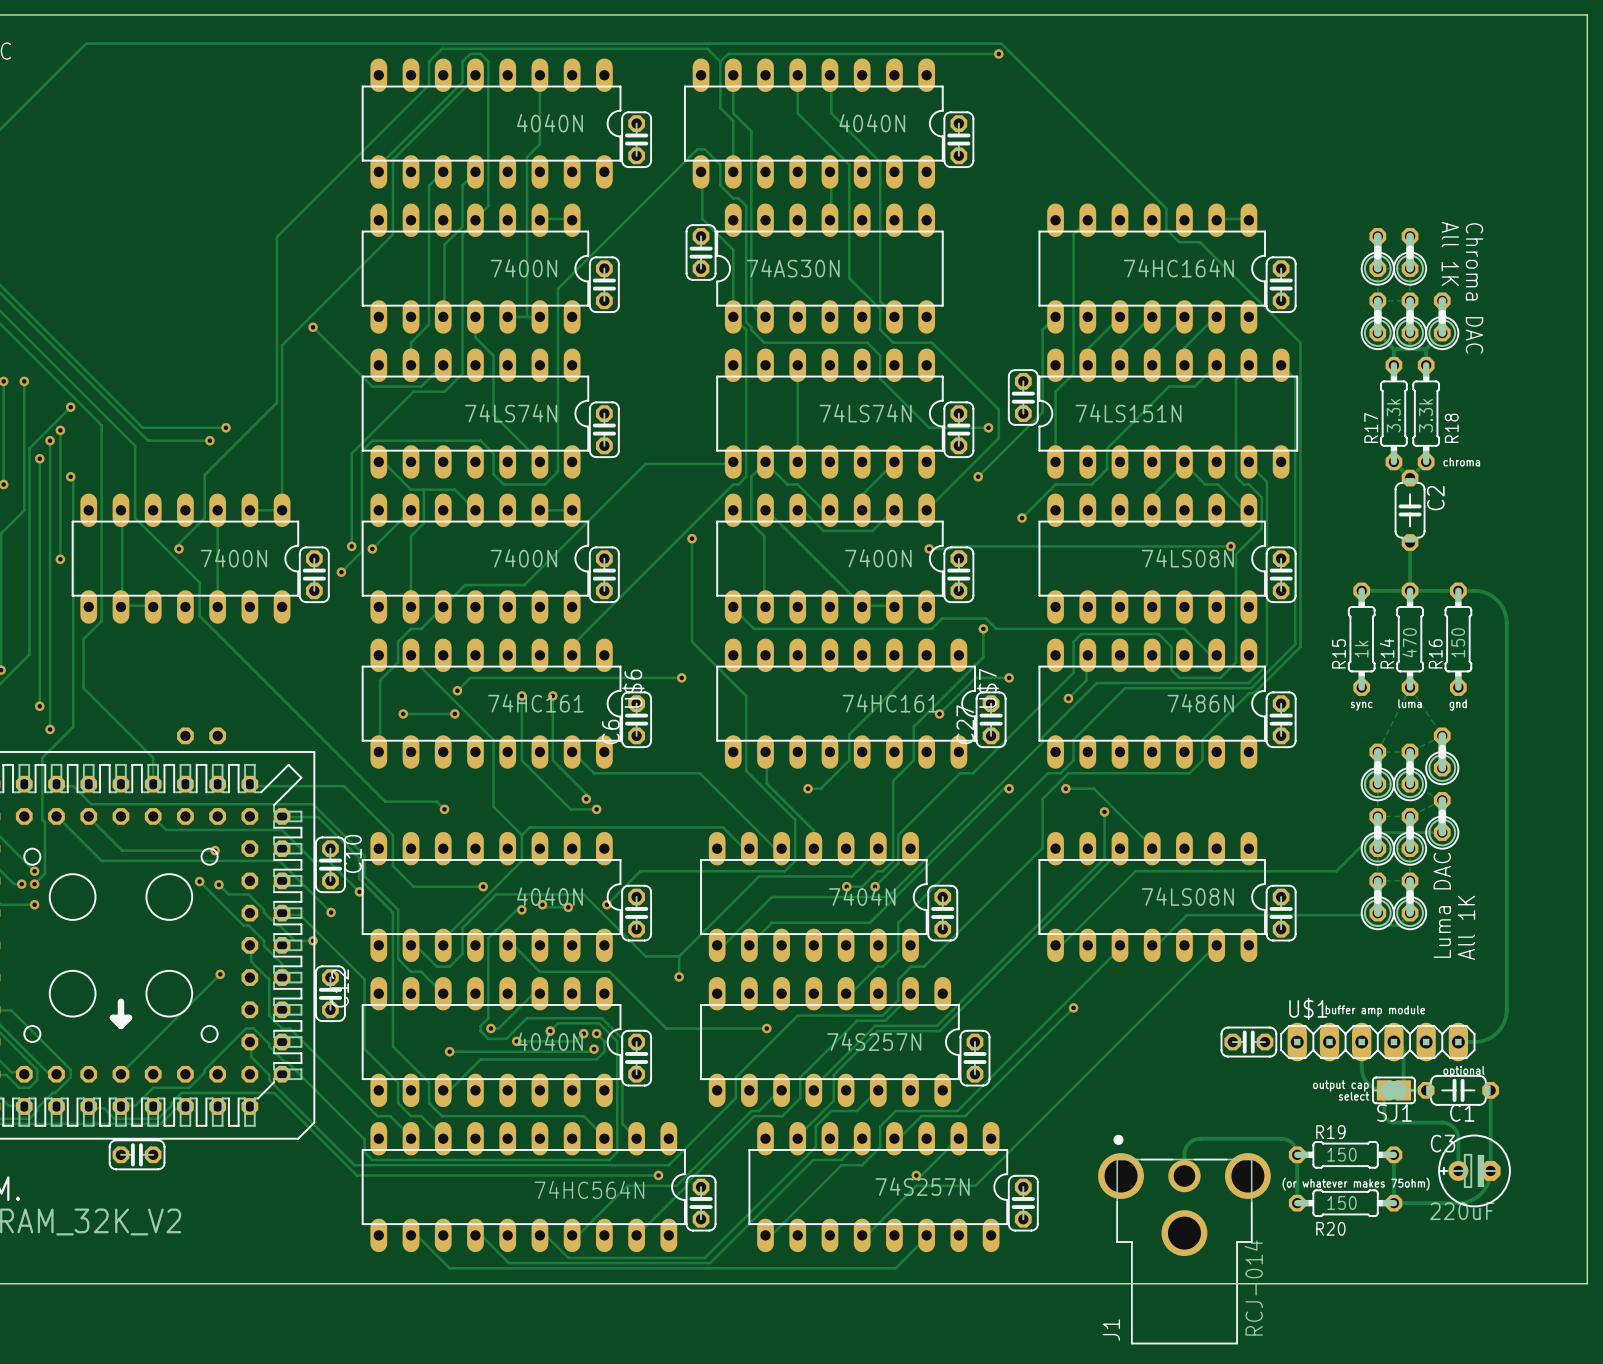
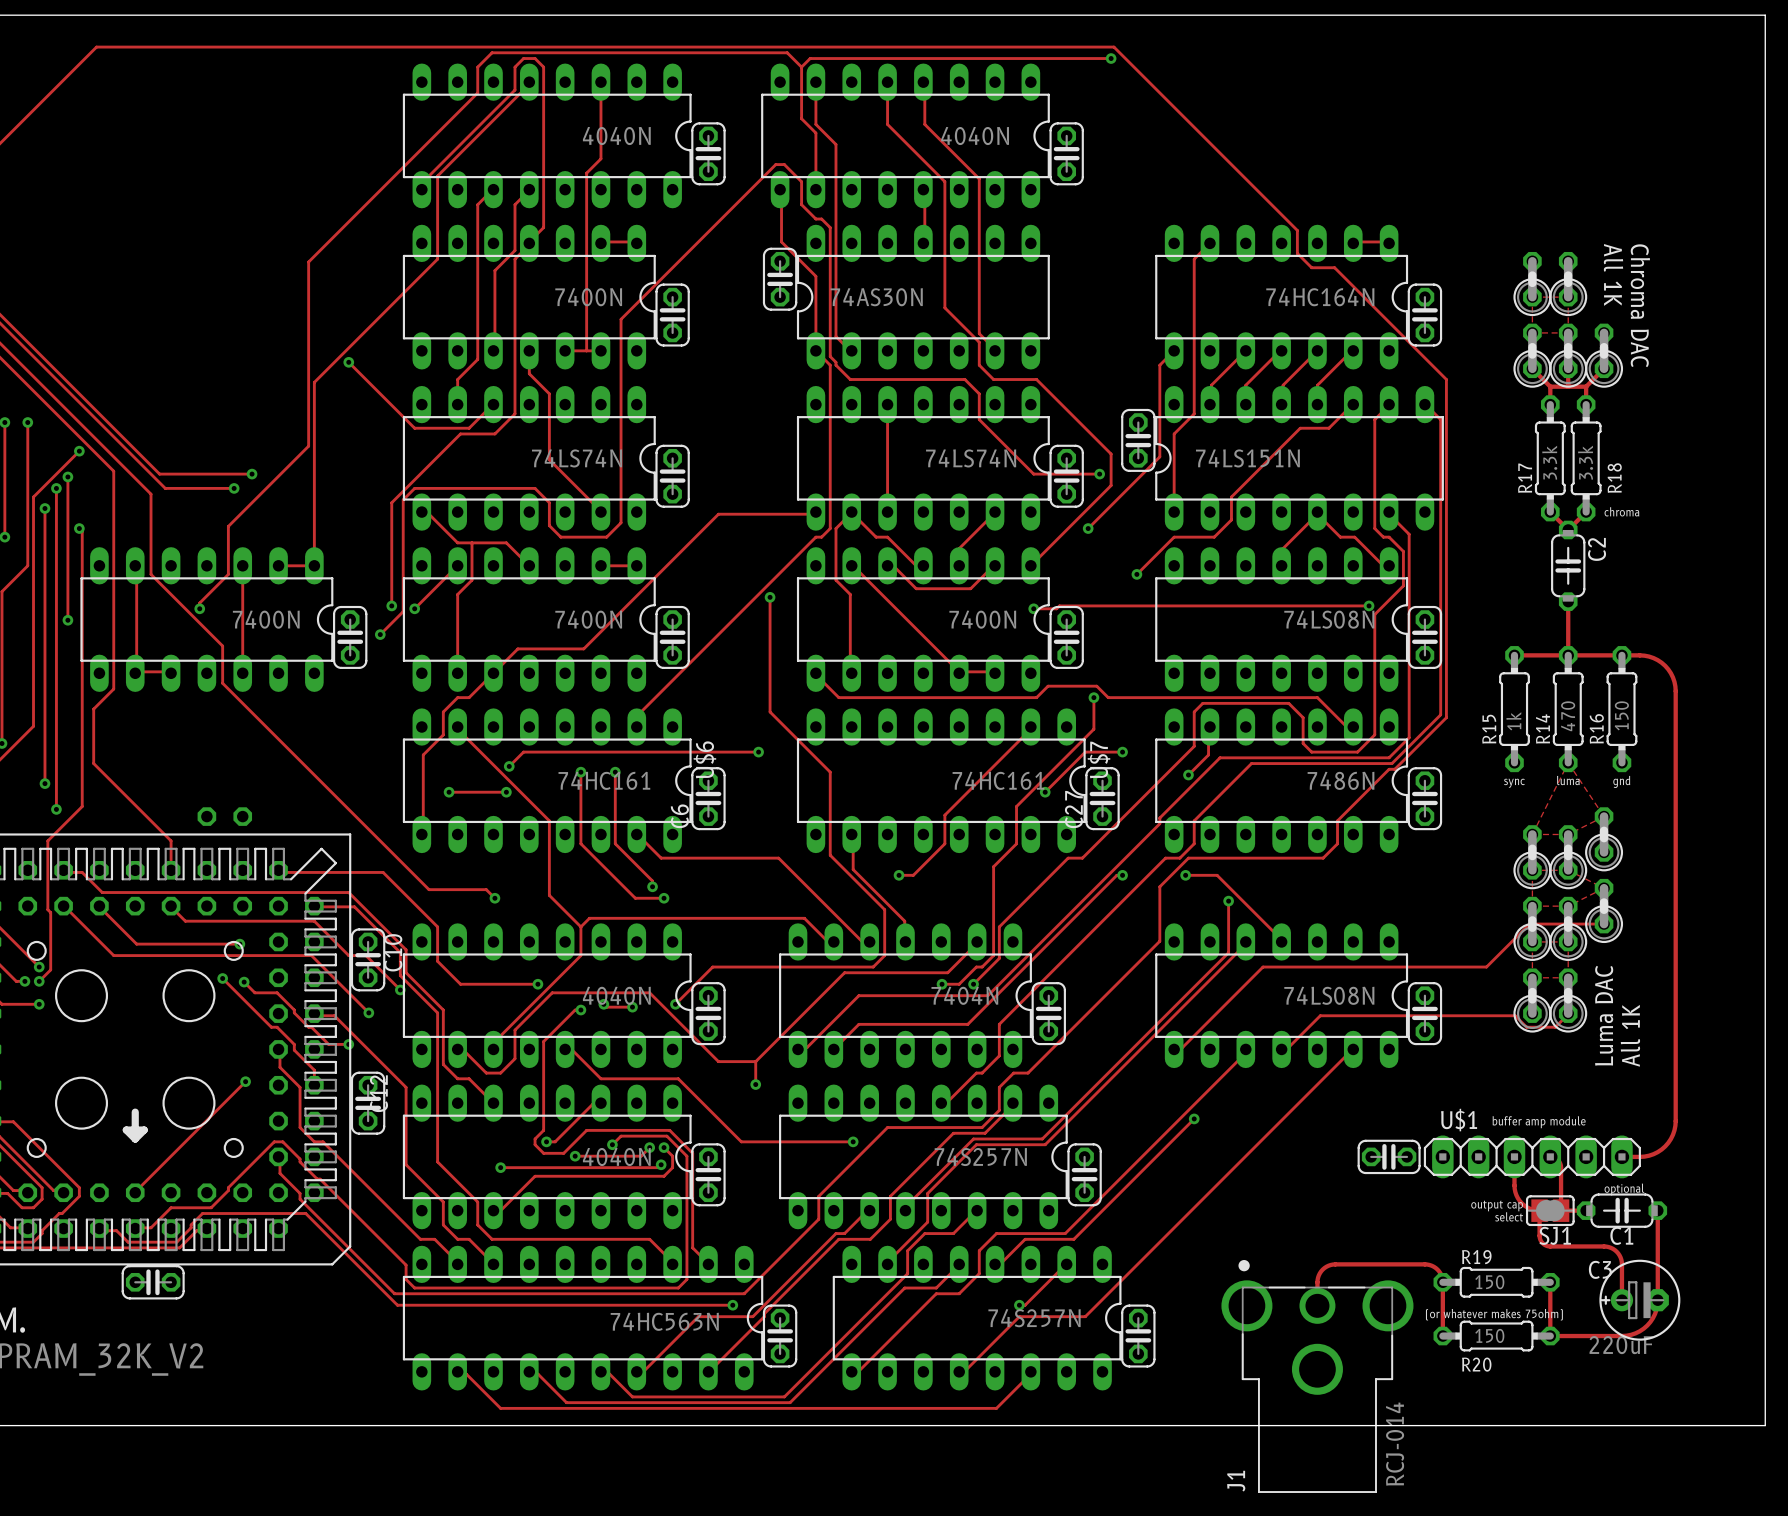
part value: 74HC564N (589, 1189) -> 74HC563N (664, 1321)

